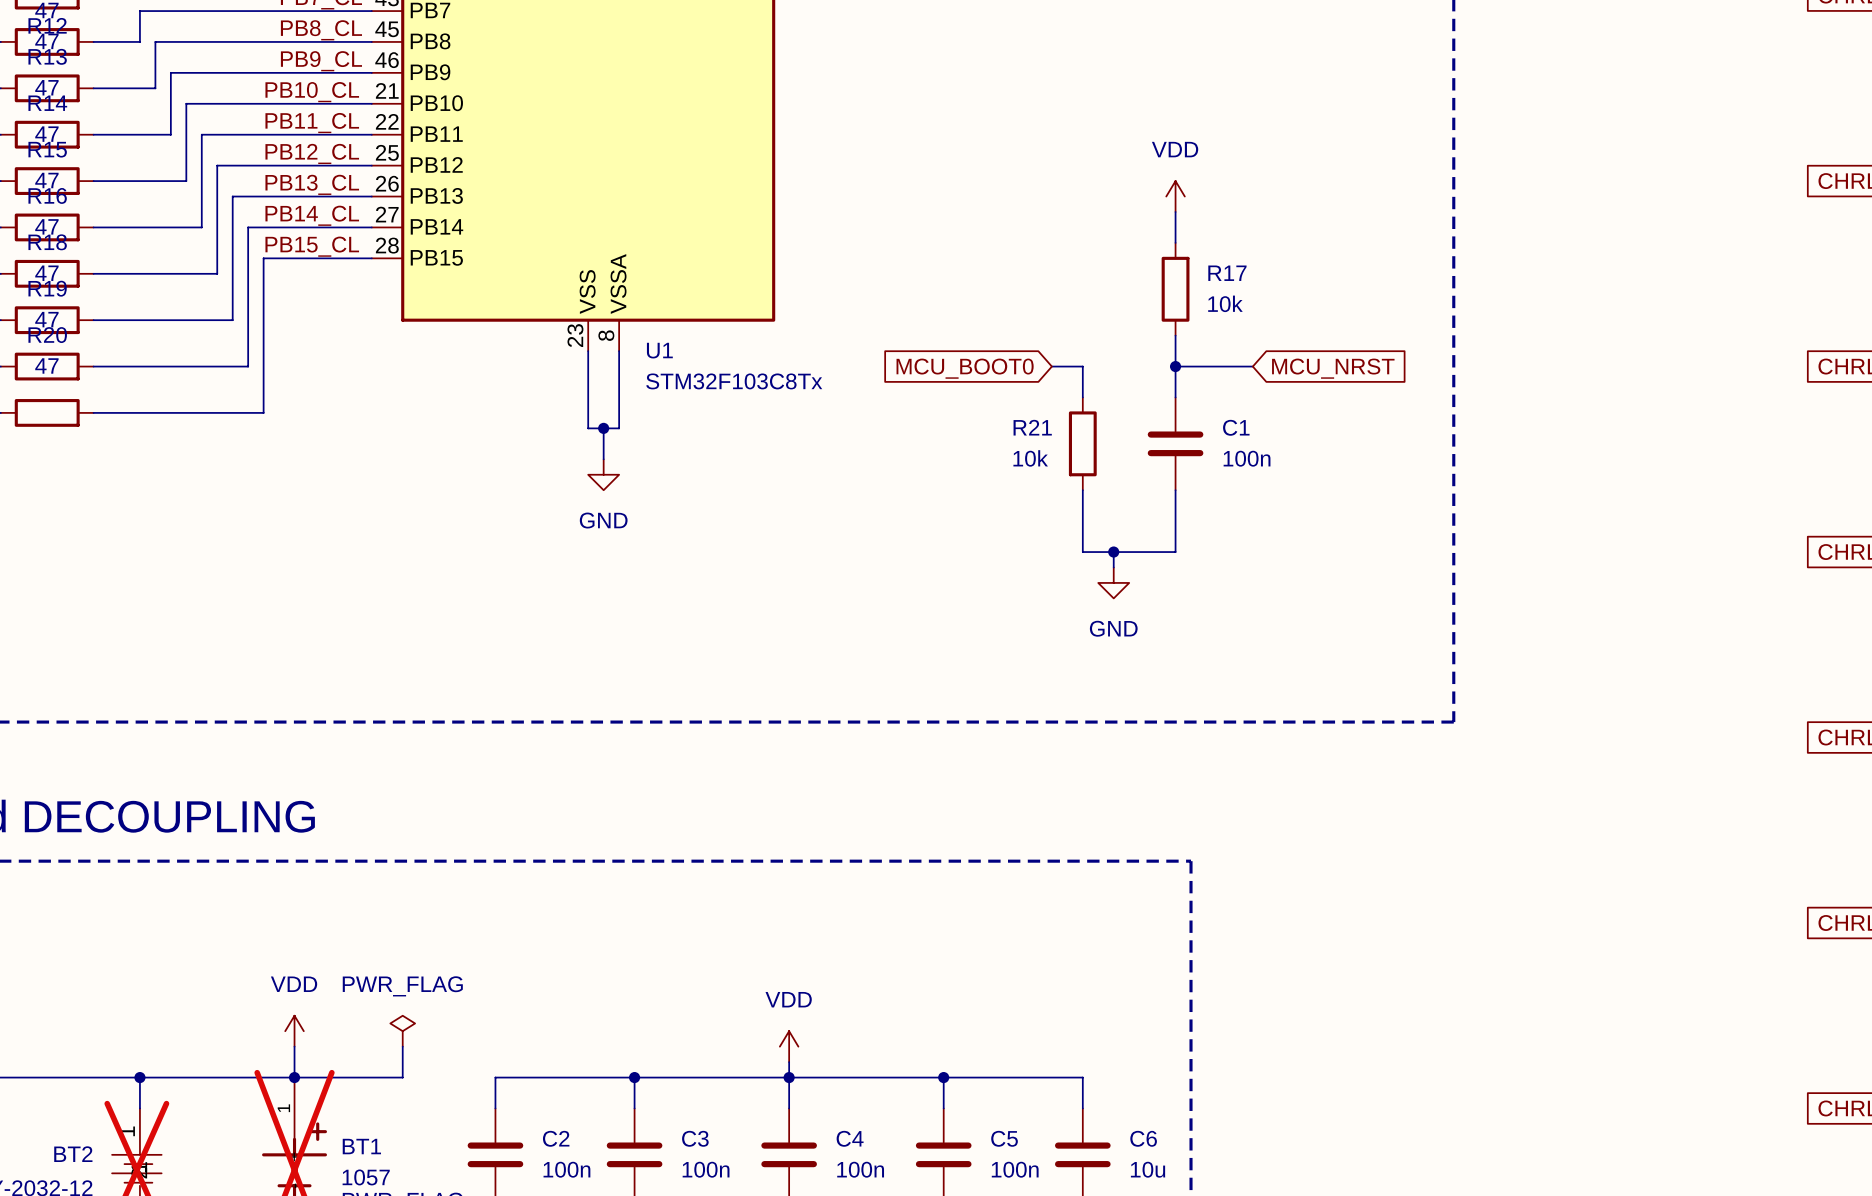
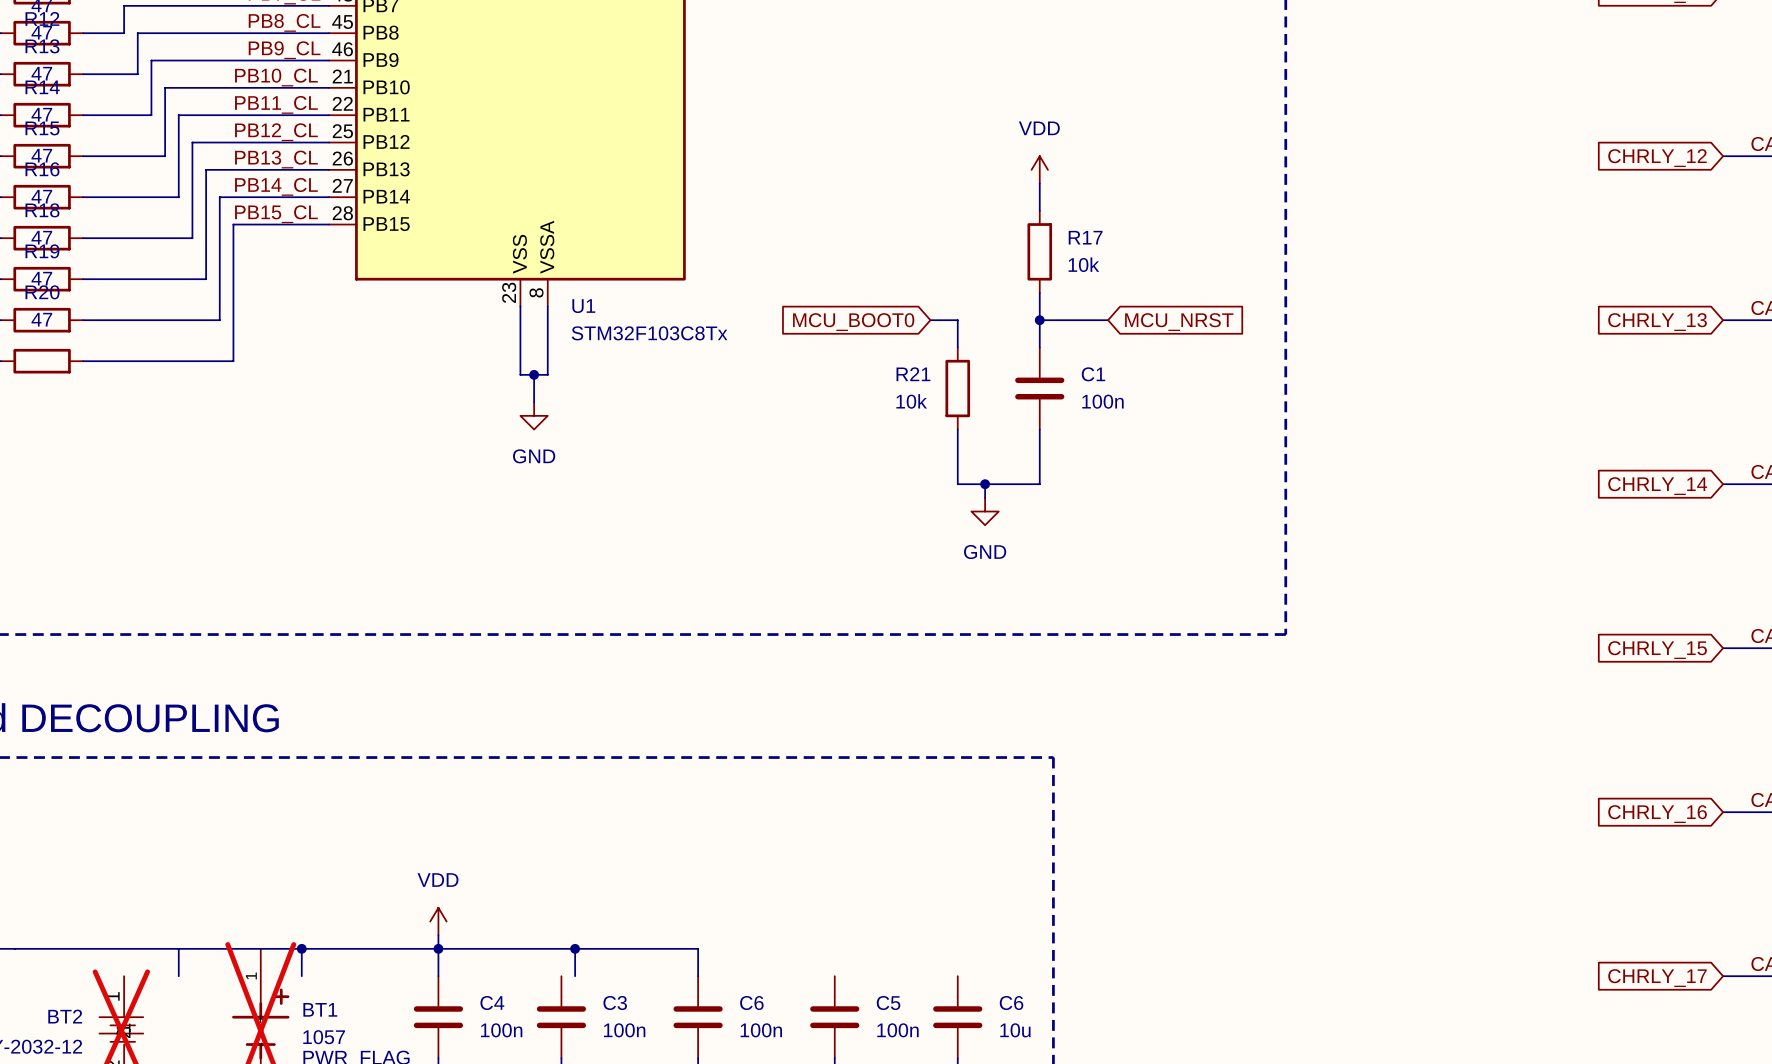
power symbol: VDD (294, 1031) -> none
power symbol: PWR_FLAG (402, 1031) -> none
wire: (294, 1046) (294, 1077) -> none
wire: (402, 1046) (402, 1077) -> (438, 935) (438, 948) (356, 948)
power symbol: none -> VDD (438, 921)
power symbol: VDD (789, 1046) -> none
wire: (789, 1062) (789, 1077) (1082, 1077) (1082, 1108) -> none
wire: (139, 1077) (139, 1108) -> (178, 948) (178, 976)
junction: (139, 1077) -> none
junction position: (294, 1077) -> (301, 948)
junction: none -> (438, 948)
wire: (634, 1077) (634, 1108) -> (301, 948) (301, 976)
junction position: (634, 1077) -> (575, 948)
junction: (789, 1077) -> none
wire: (943, 1077) (943, 1108) -> (575, 948) (575, 976)
junction: (943, 1077) -> none
C2 name: C2 (556, 1138) -> C4 (492, 1003)
C4 name: C4 (850, 1138) -> C6 (751, 1003)

